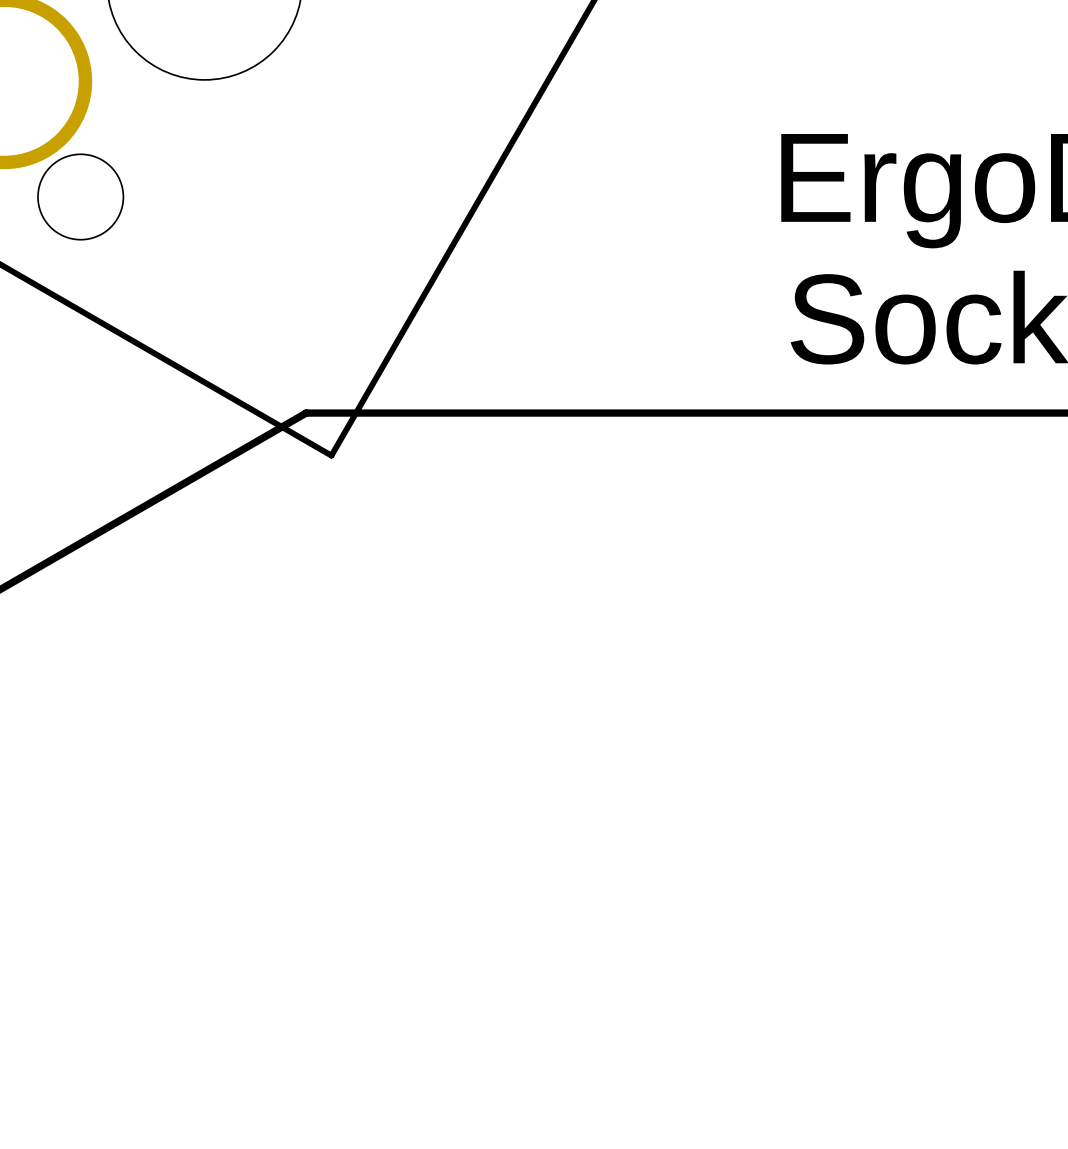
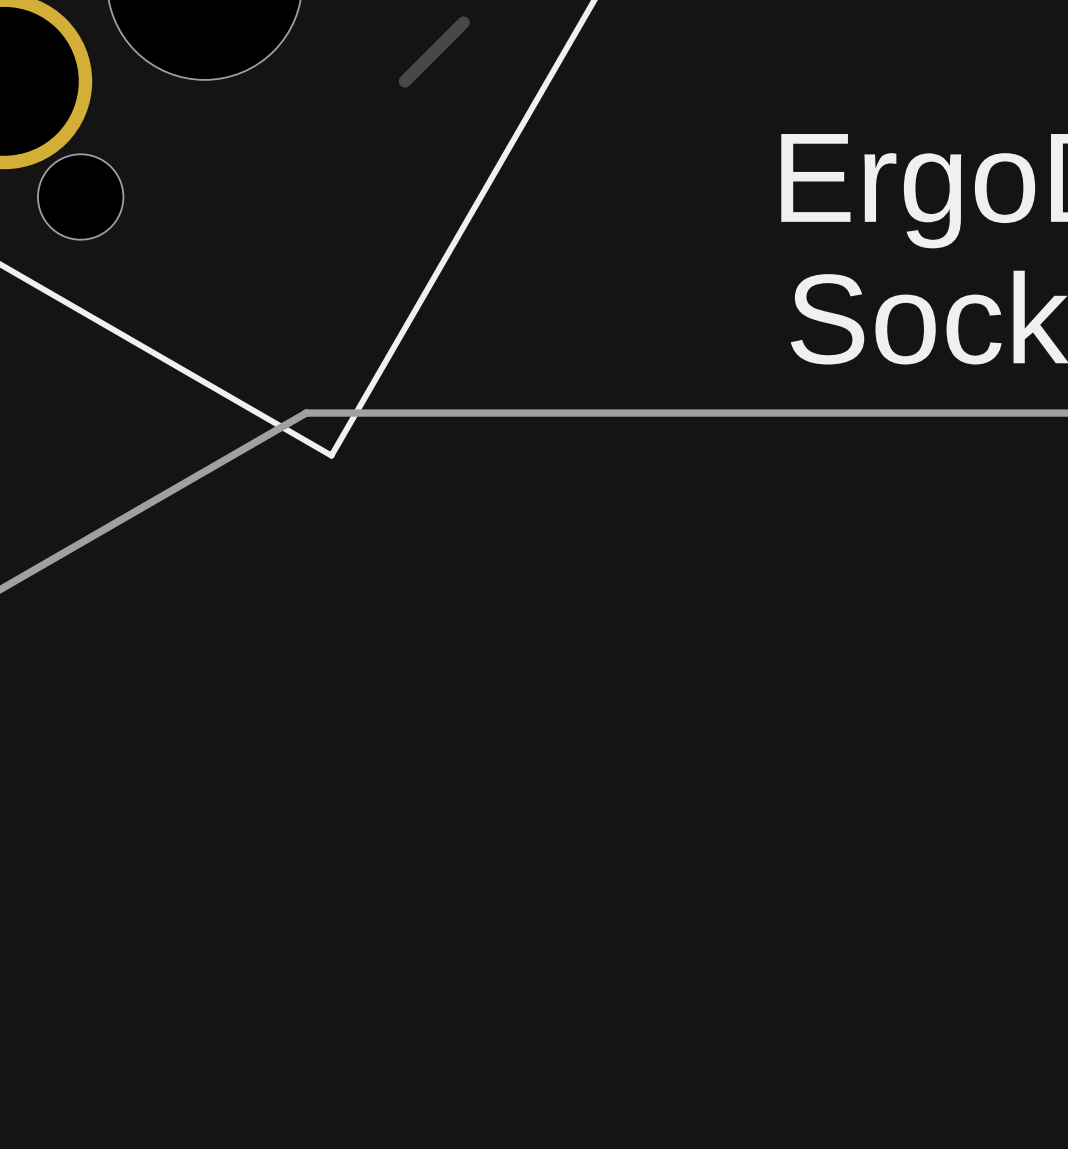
track: none -> (463, 22) (404, 81)

